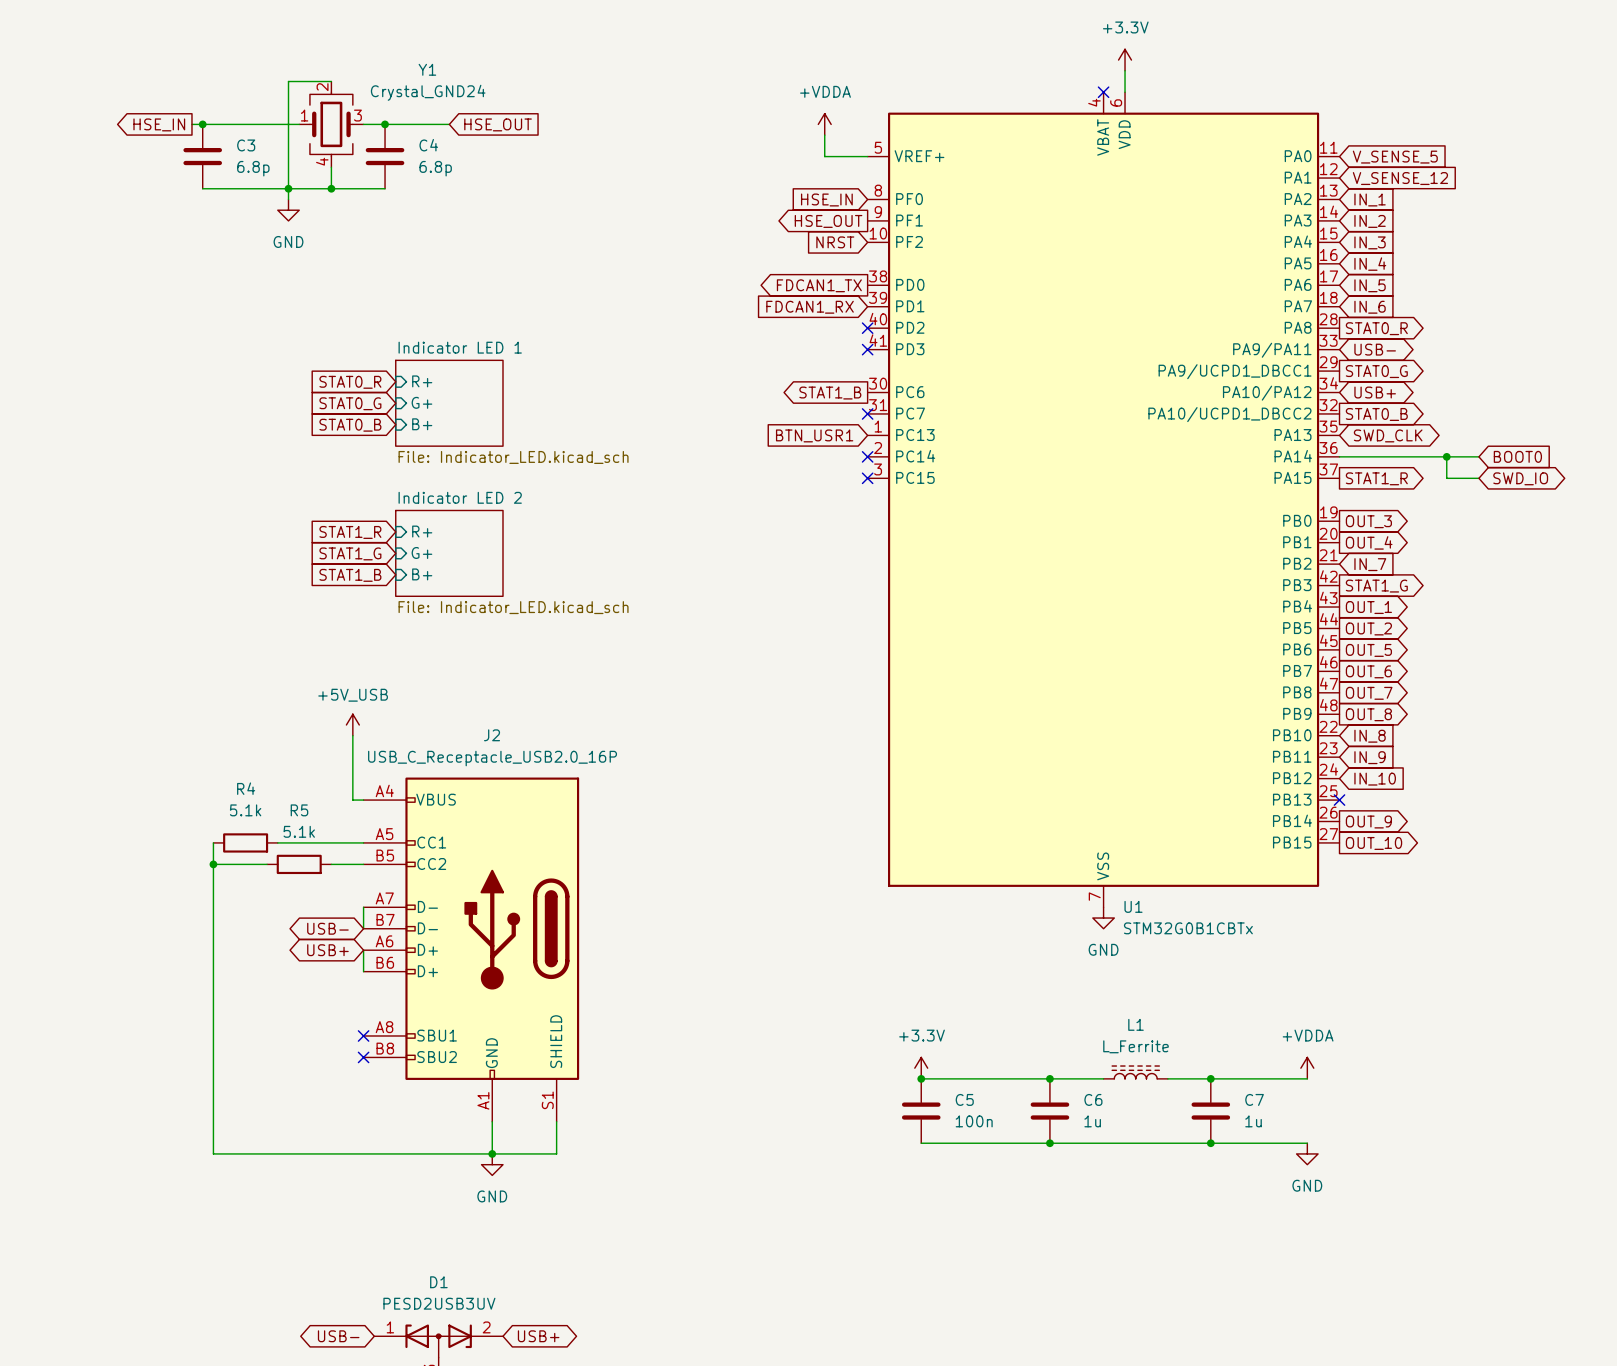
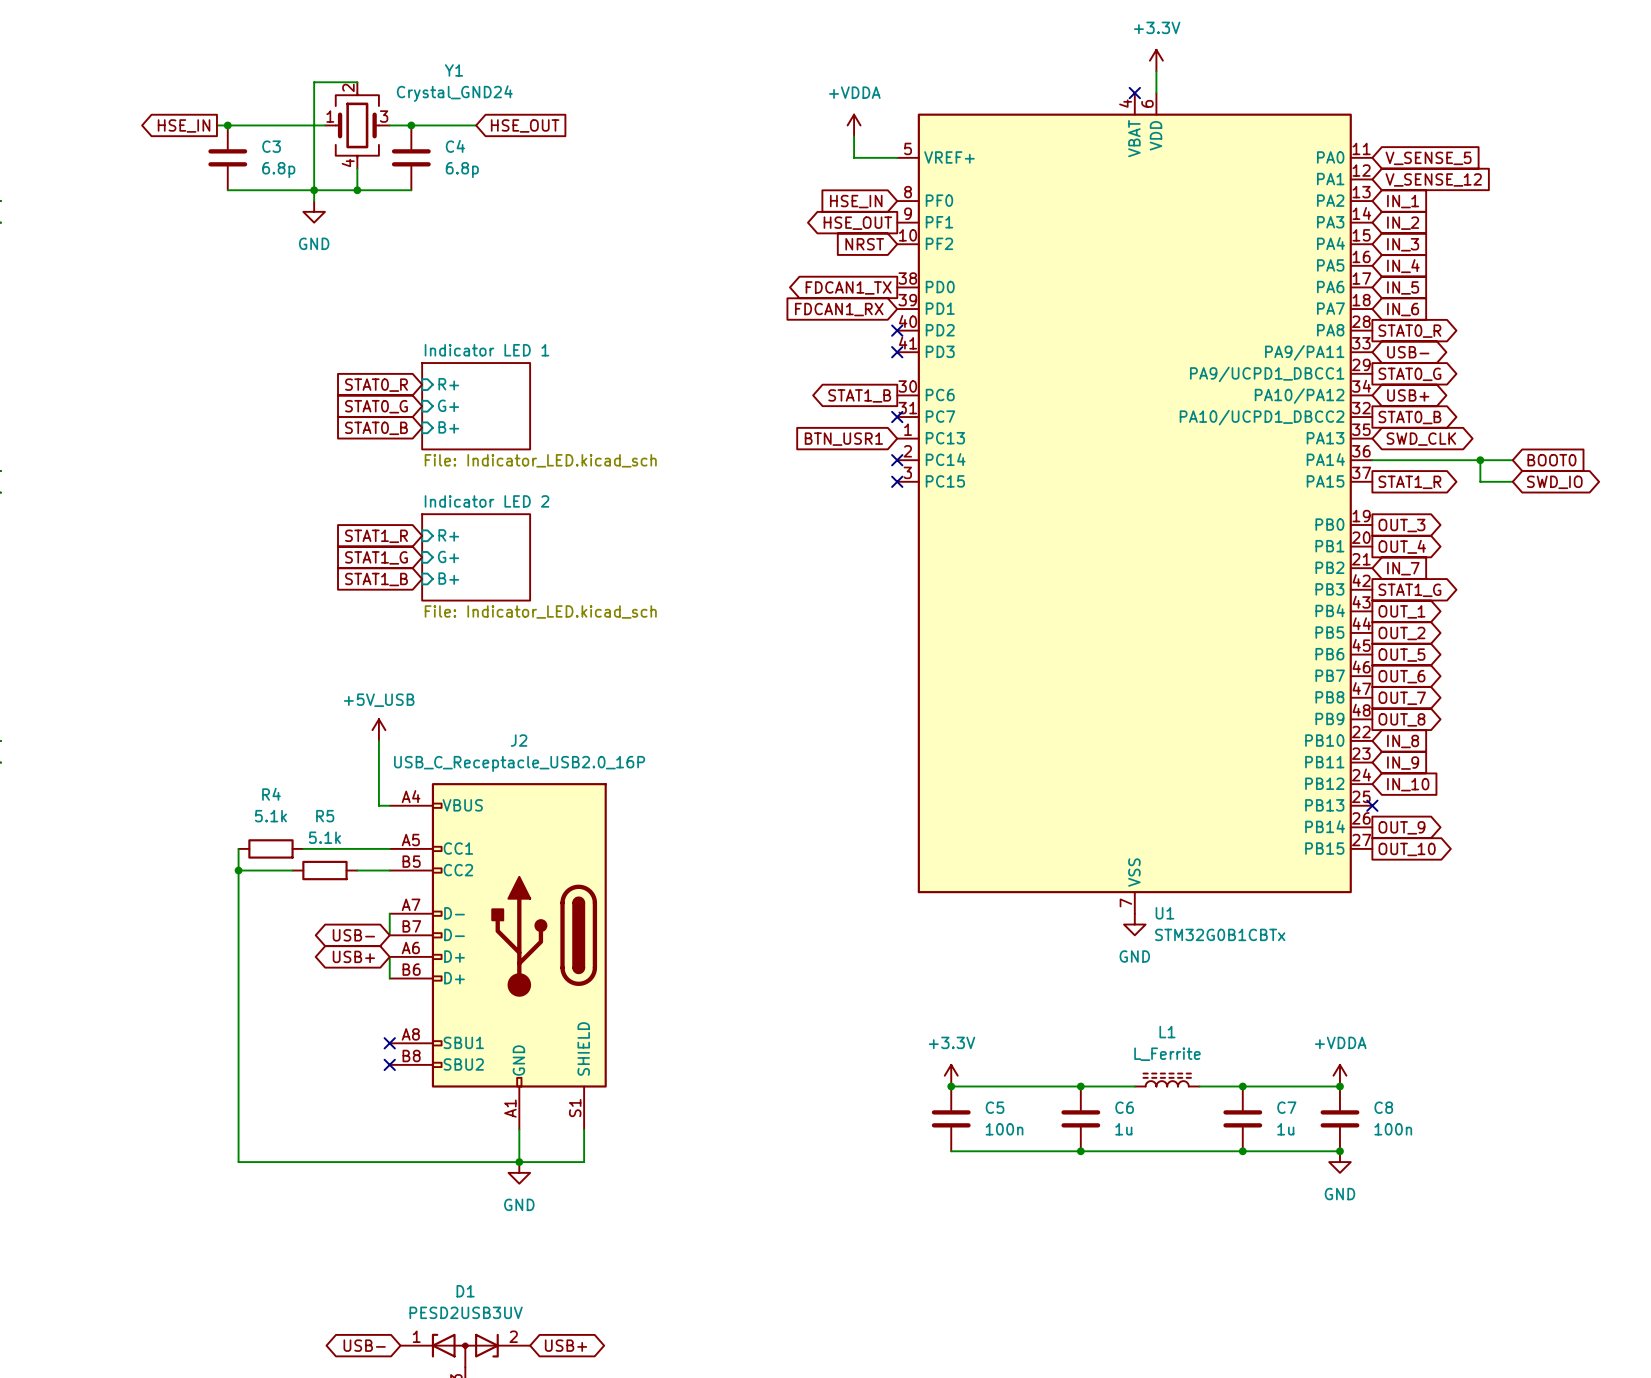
junction: none -> (1339, 1086)
C8: none -> 100n (1339, 1118)
junction: none -> (1339, 1151)

